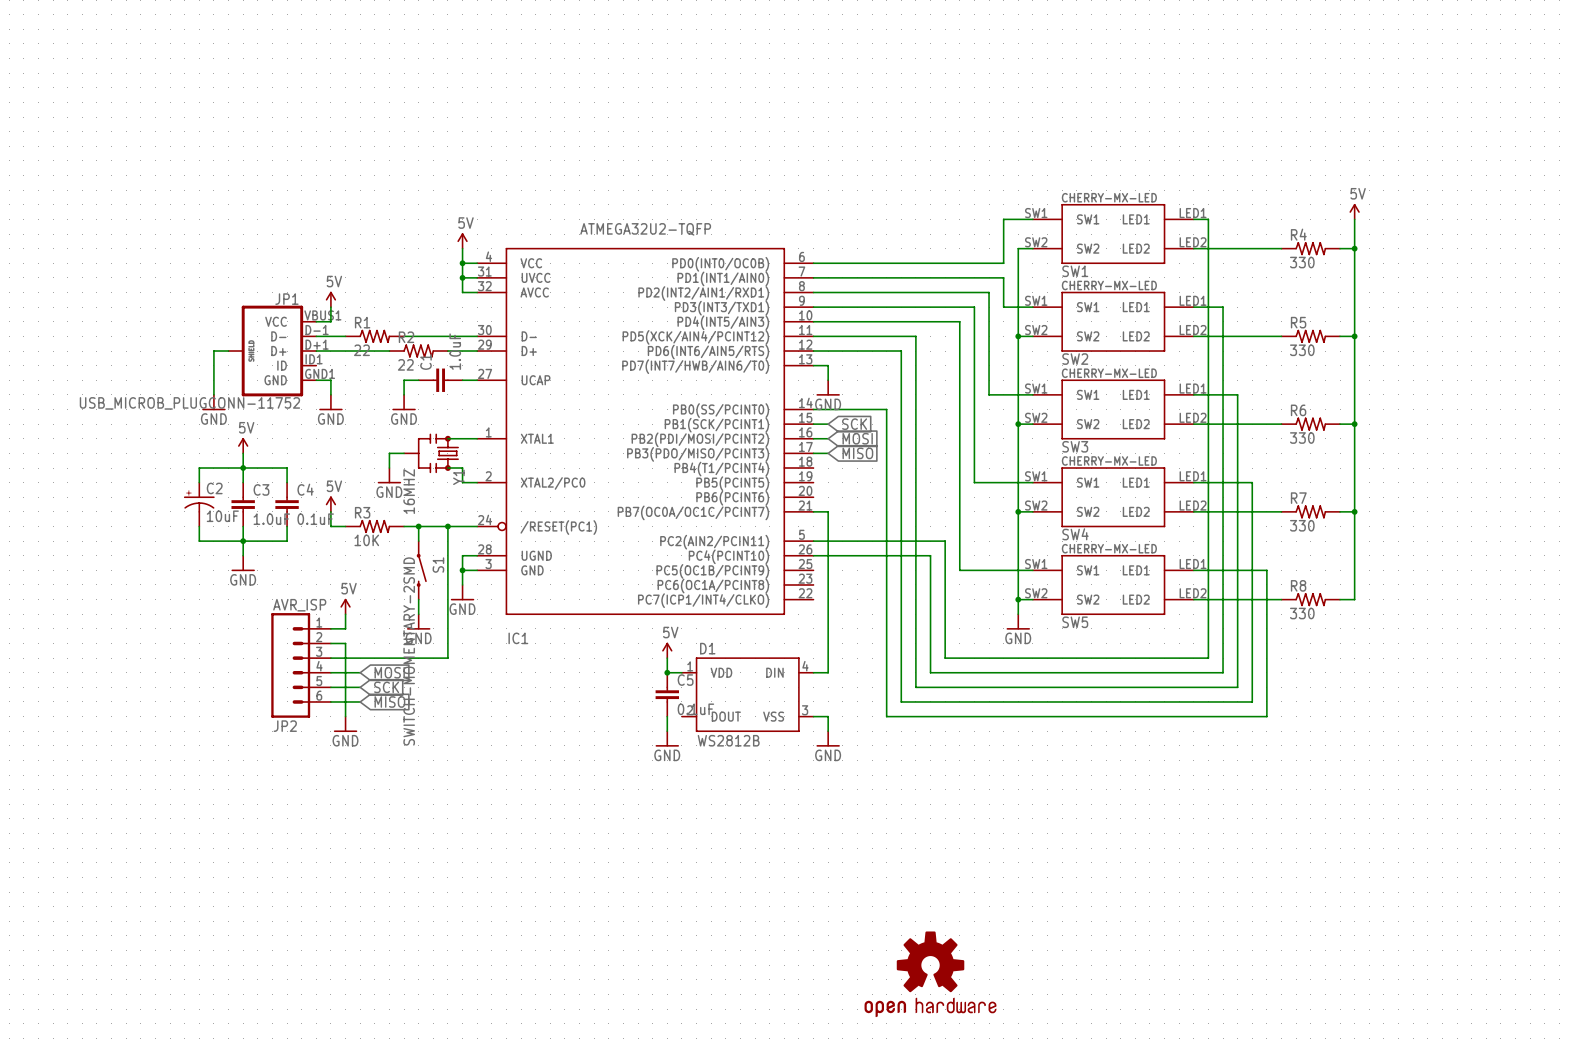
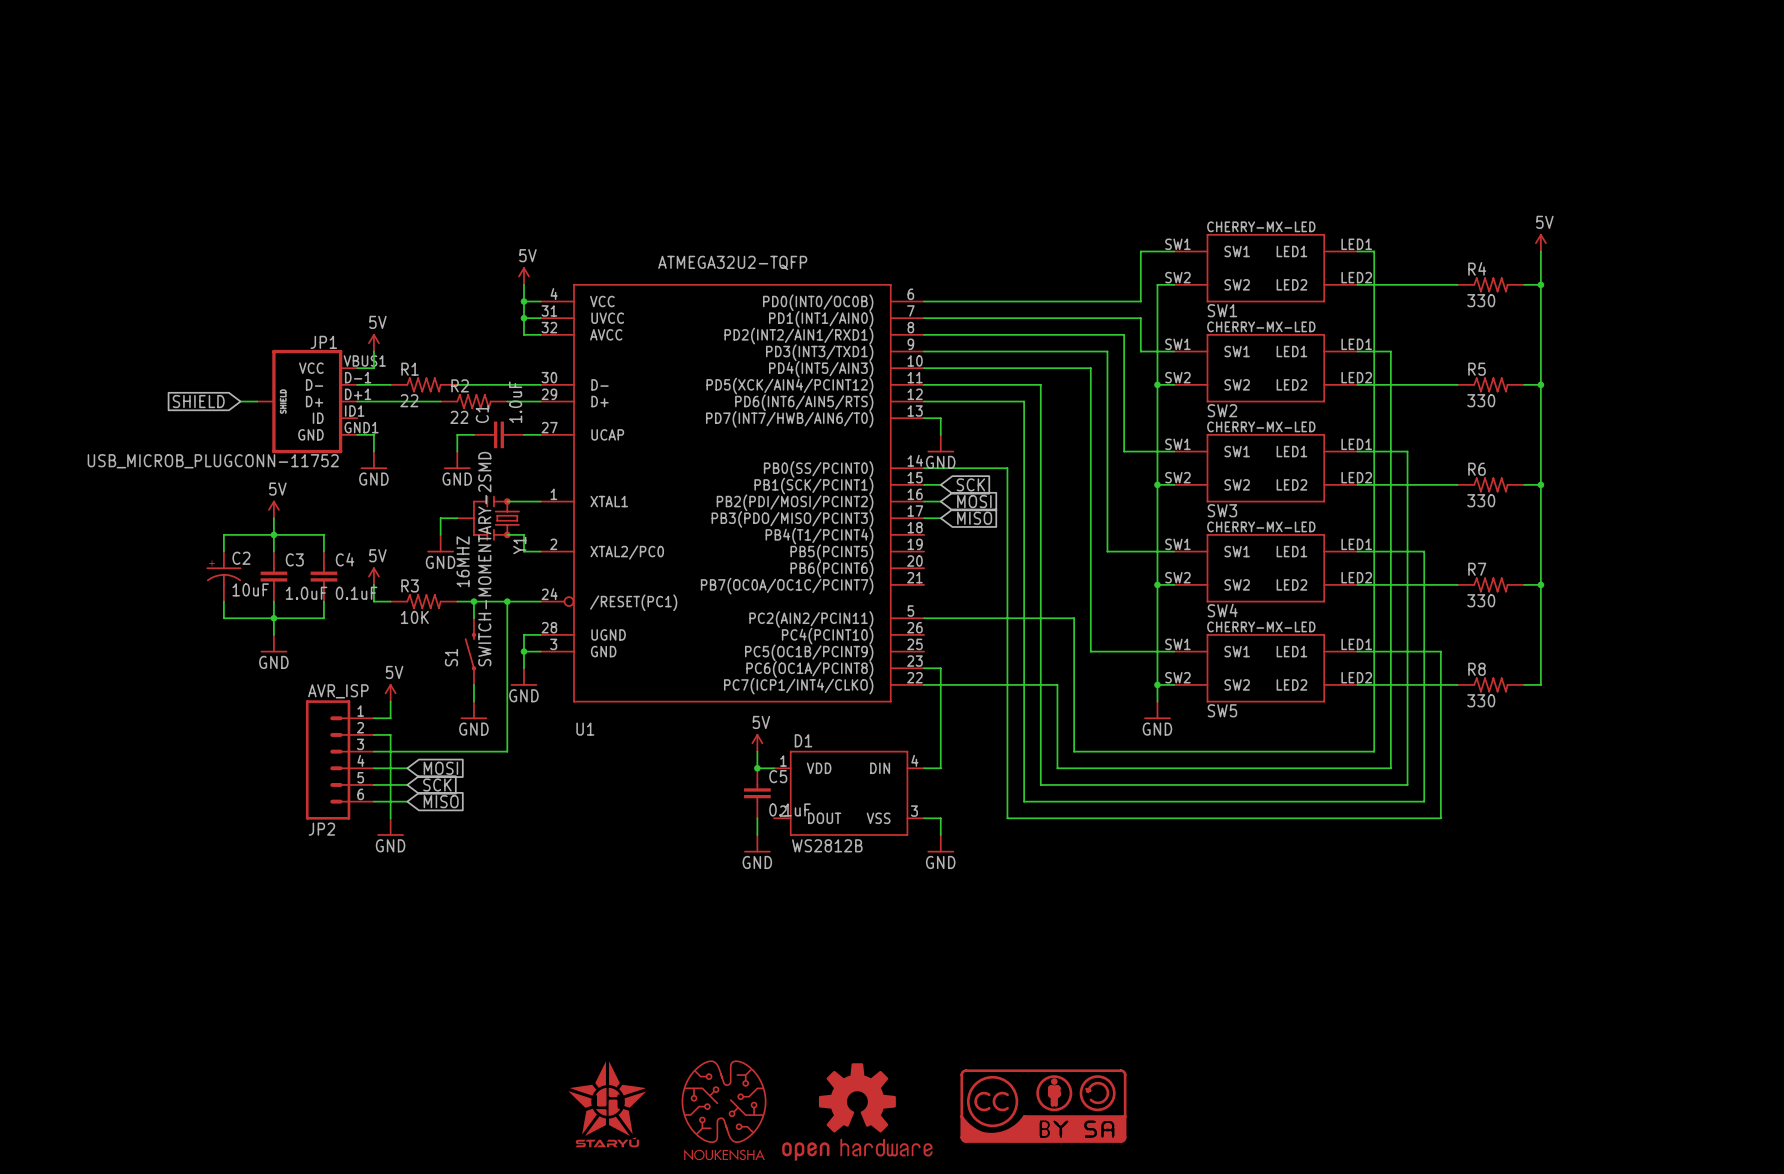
global label: none -> SHIELD (198, 401)
wire: (213, 351) (213, 394) -> none
power symbol: GND (213, 402) -> none
wire: (813, 511) (828, 511) (828, 584) -> (924, 668) (940, 668)
wire: (813, 555) (930, 555) (930, 599) -> (924, 684) (1057, 684)
S1 rotation: 0° (421, 570) -> 180° (470, 651)
IC1 name: IC1 (518, 638) -> U1 (585, 729)
part: none -> (607, 1104)
part: none -> (1043, 1106)
part: none -> (724, 1110)
part: none -> (857, 1112)
part: (930, 974) -> none

